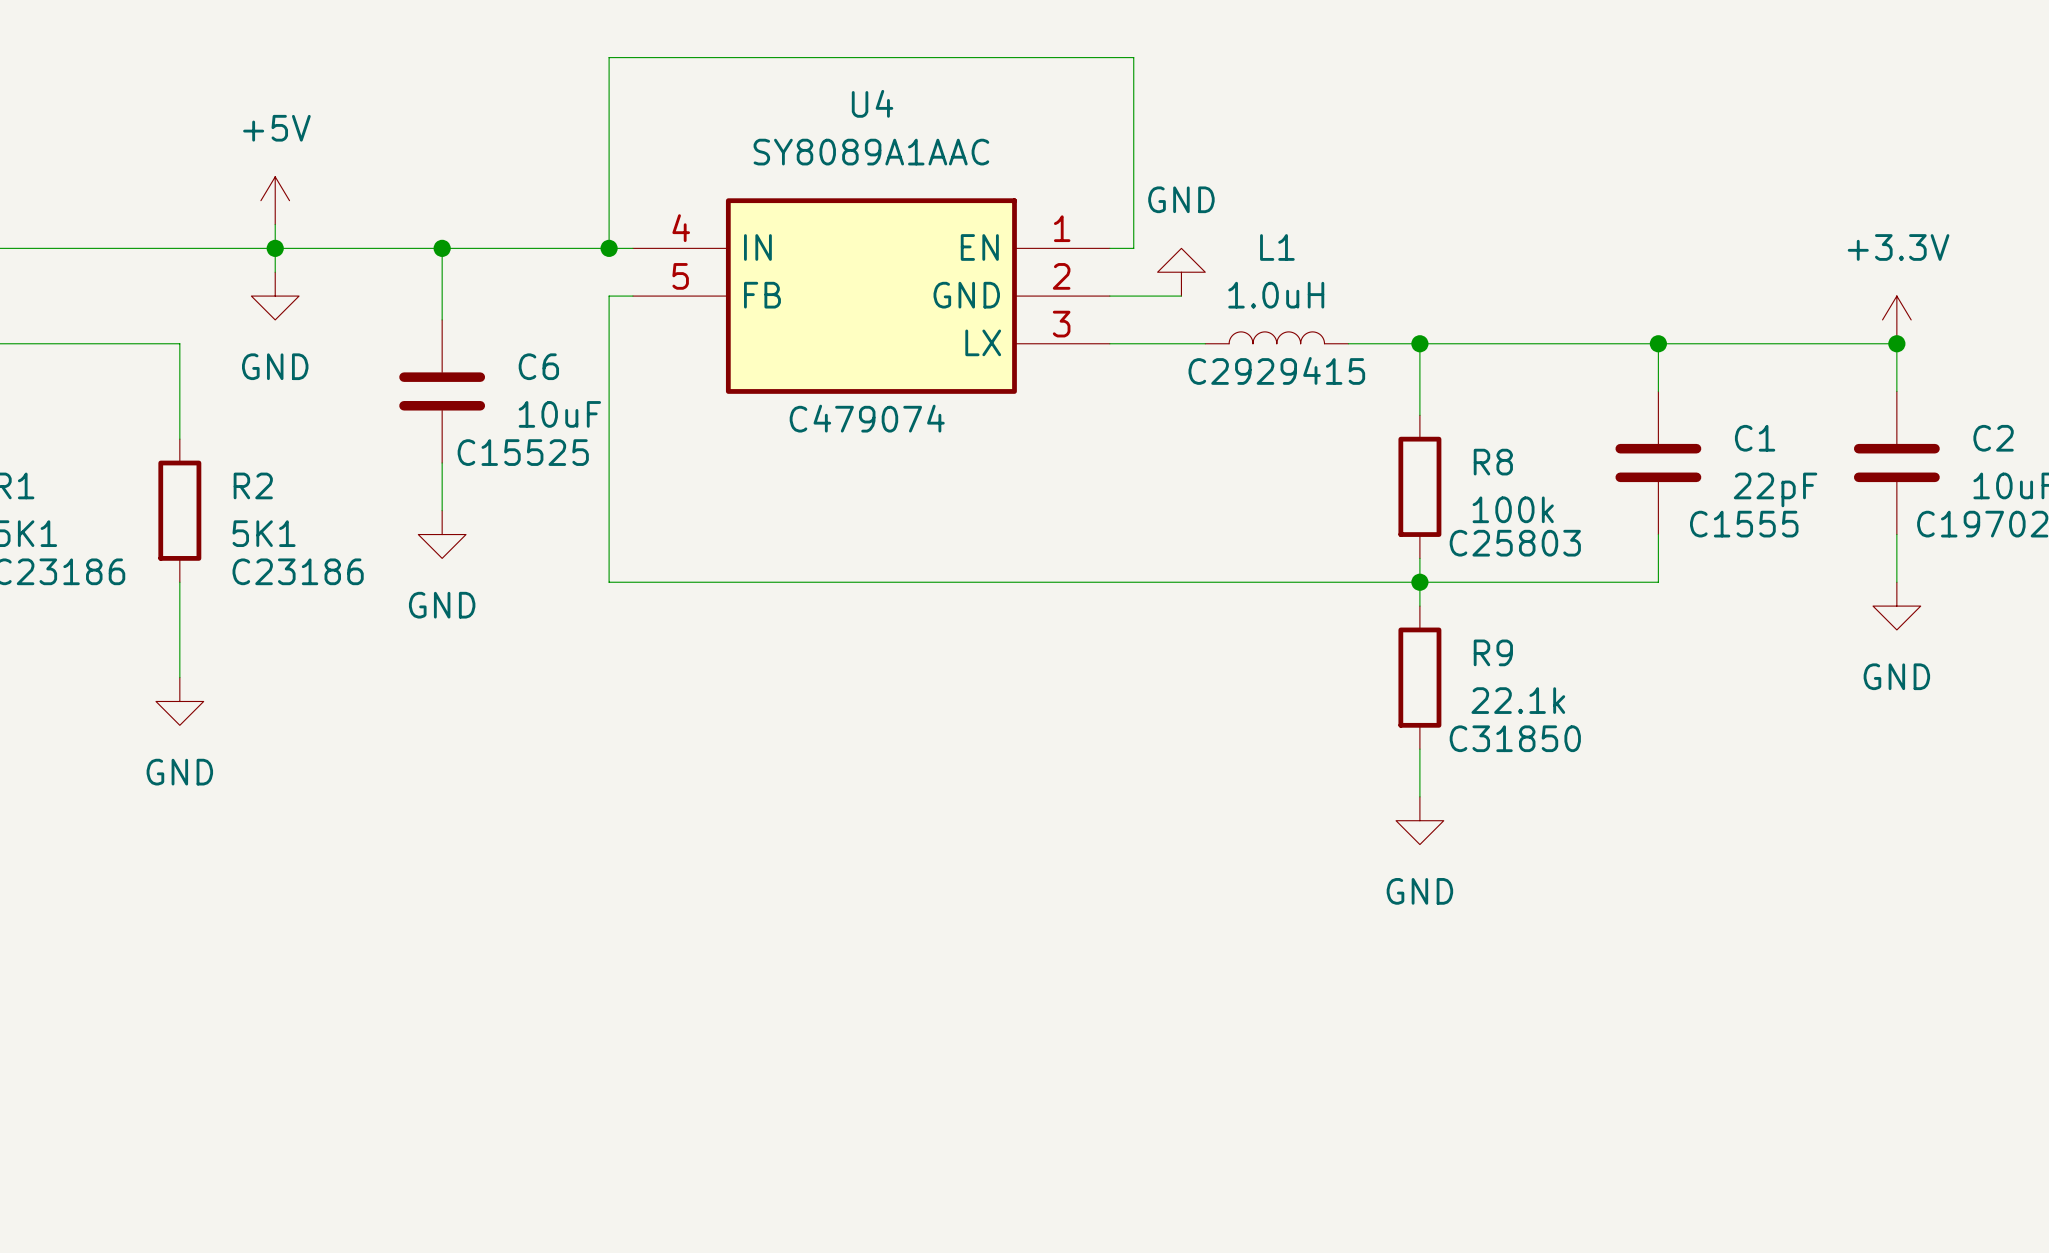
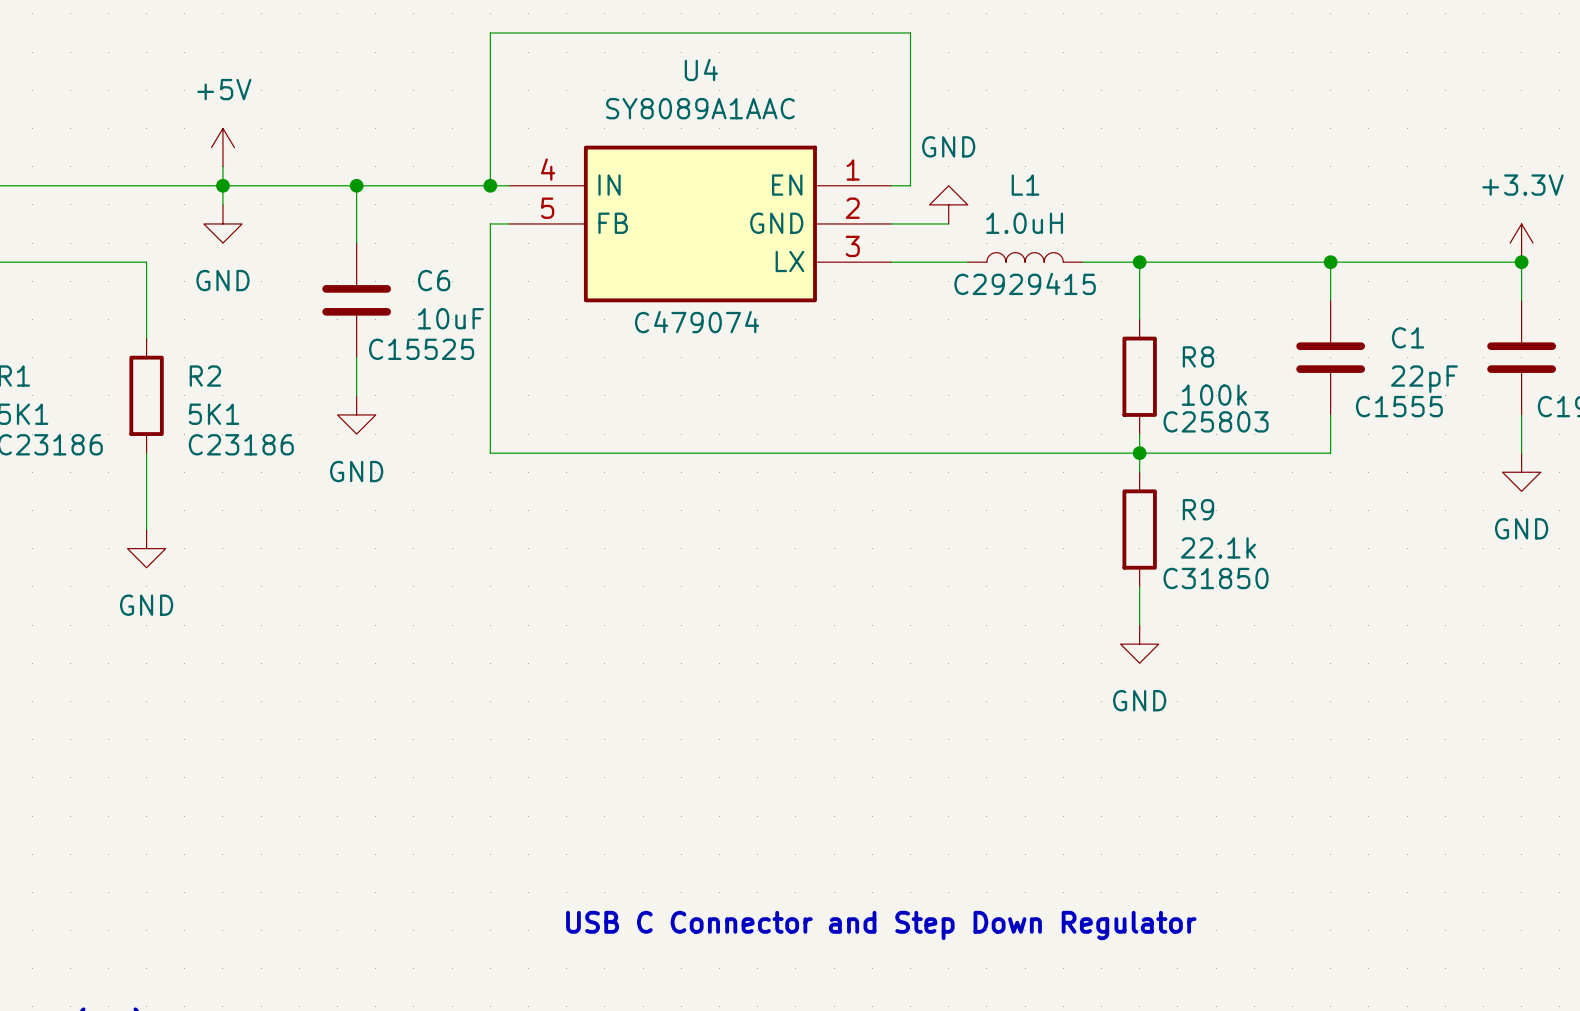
text: none -> USB C Connector and Step Down Regulator (881, 925)

